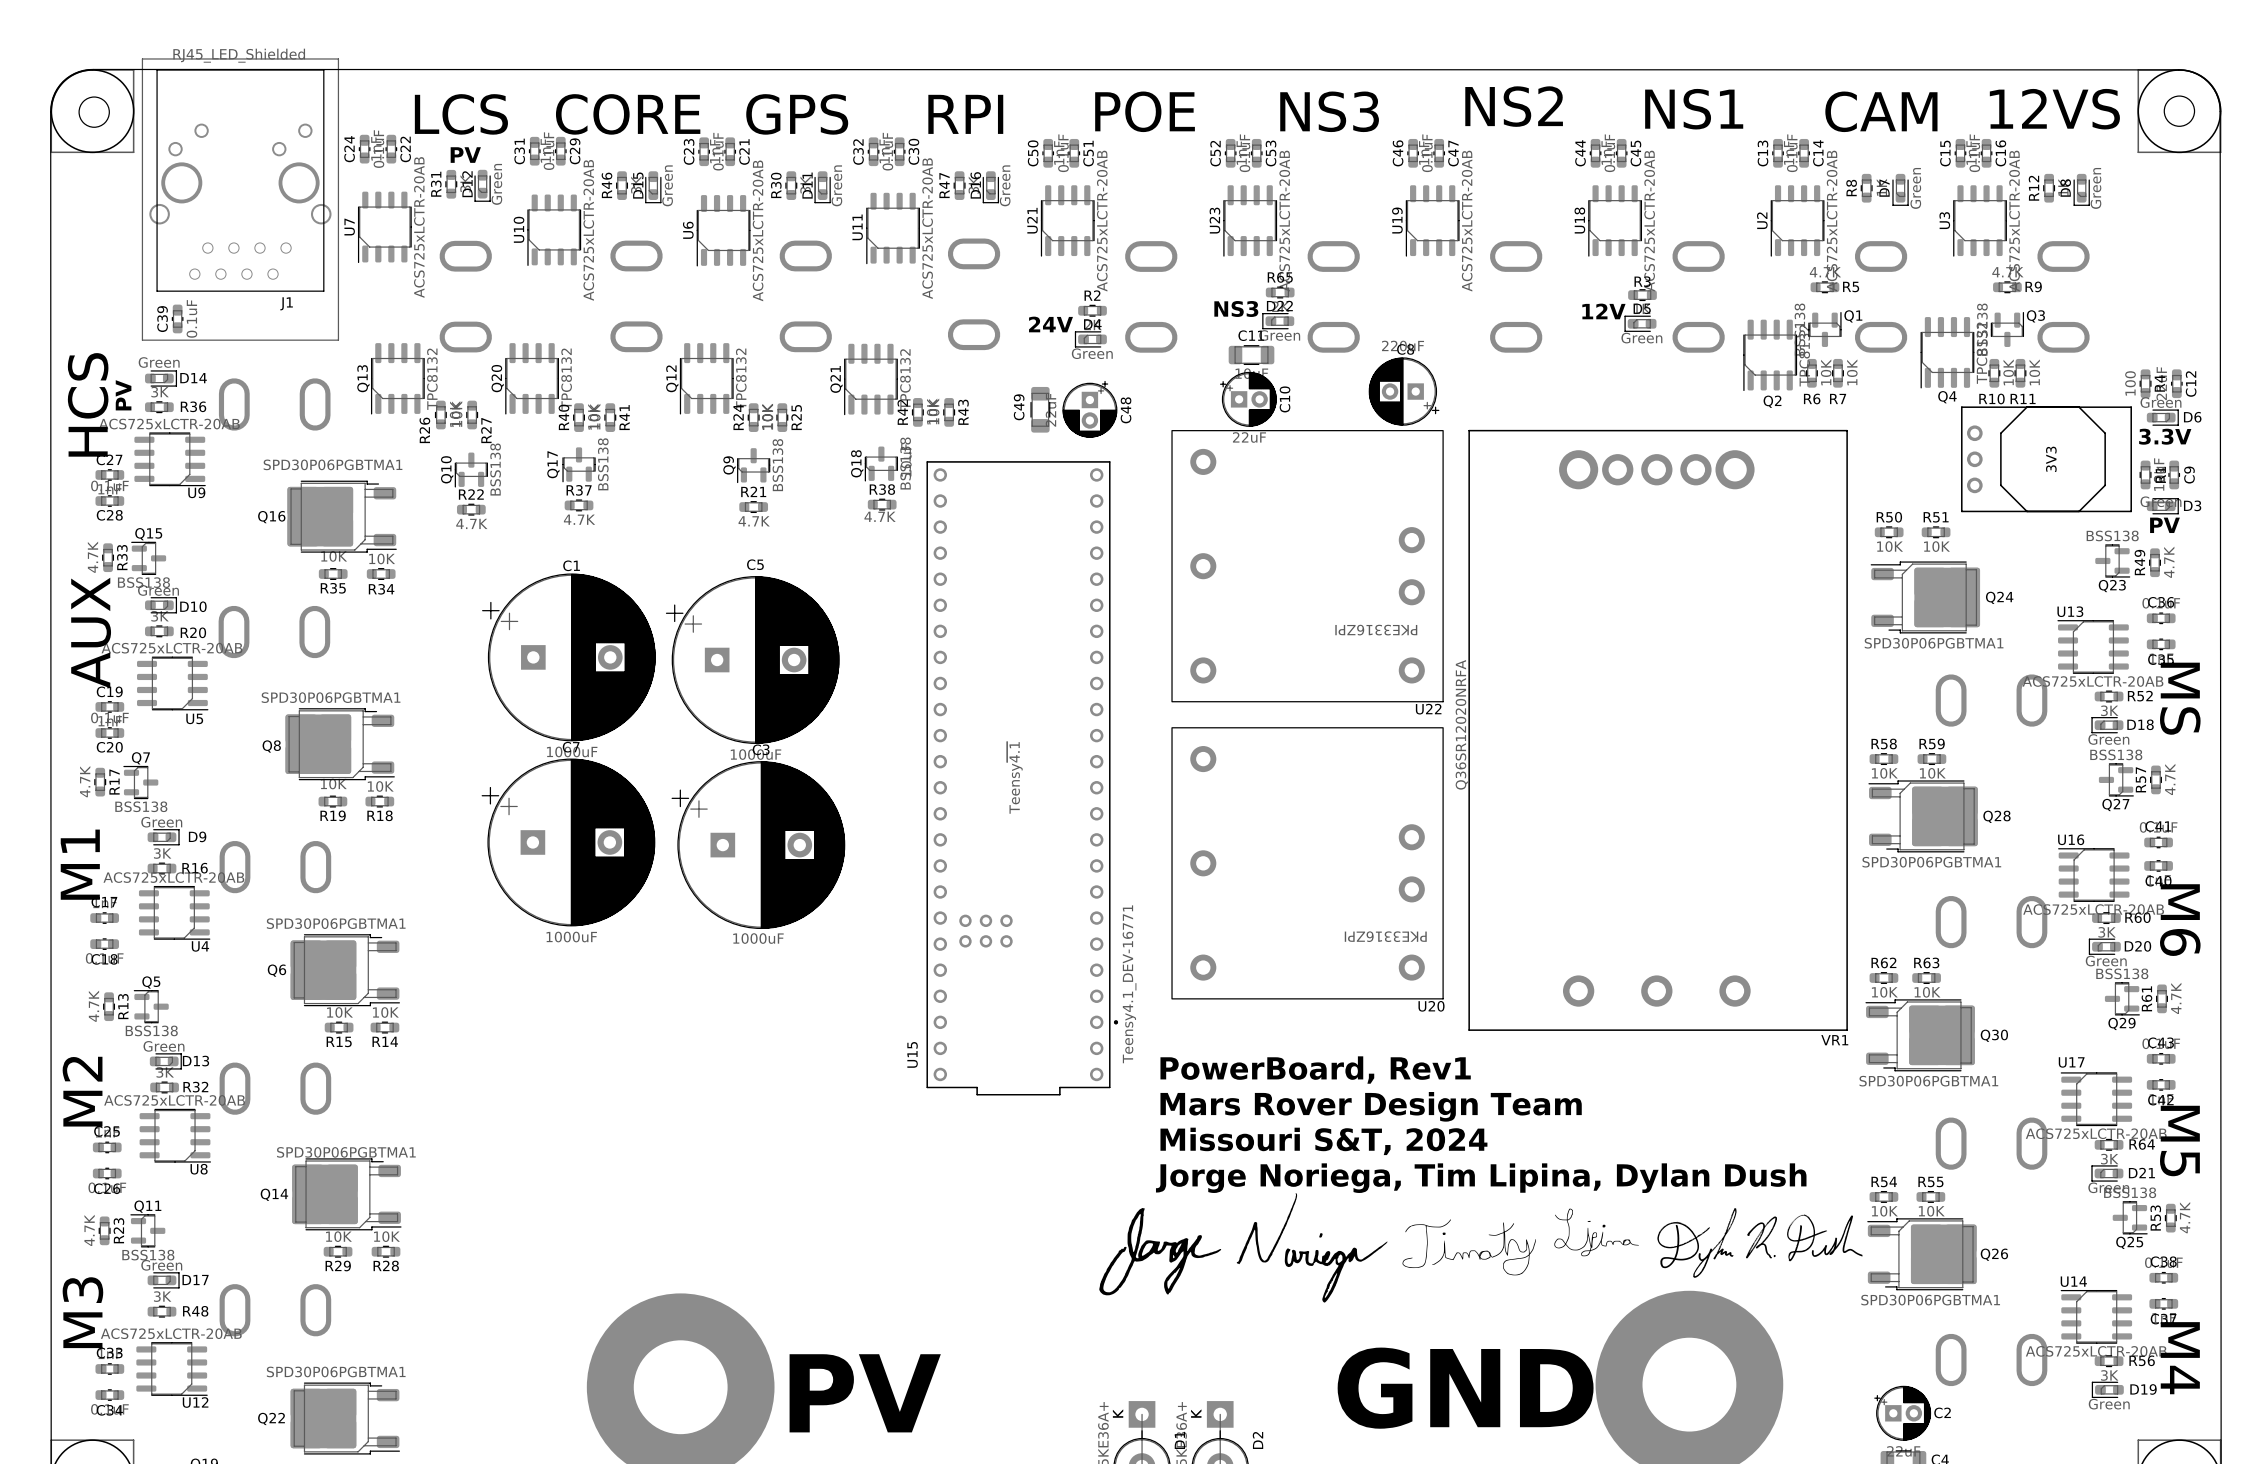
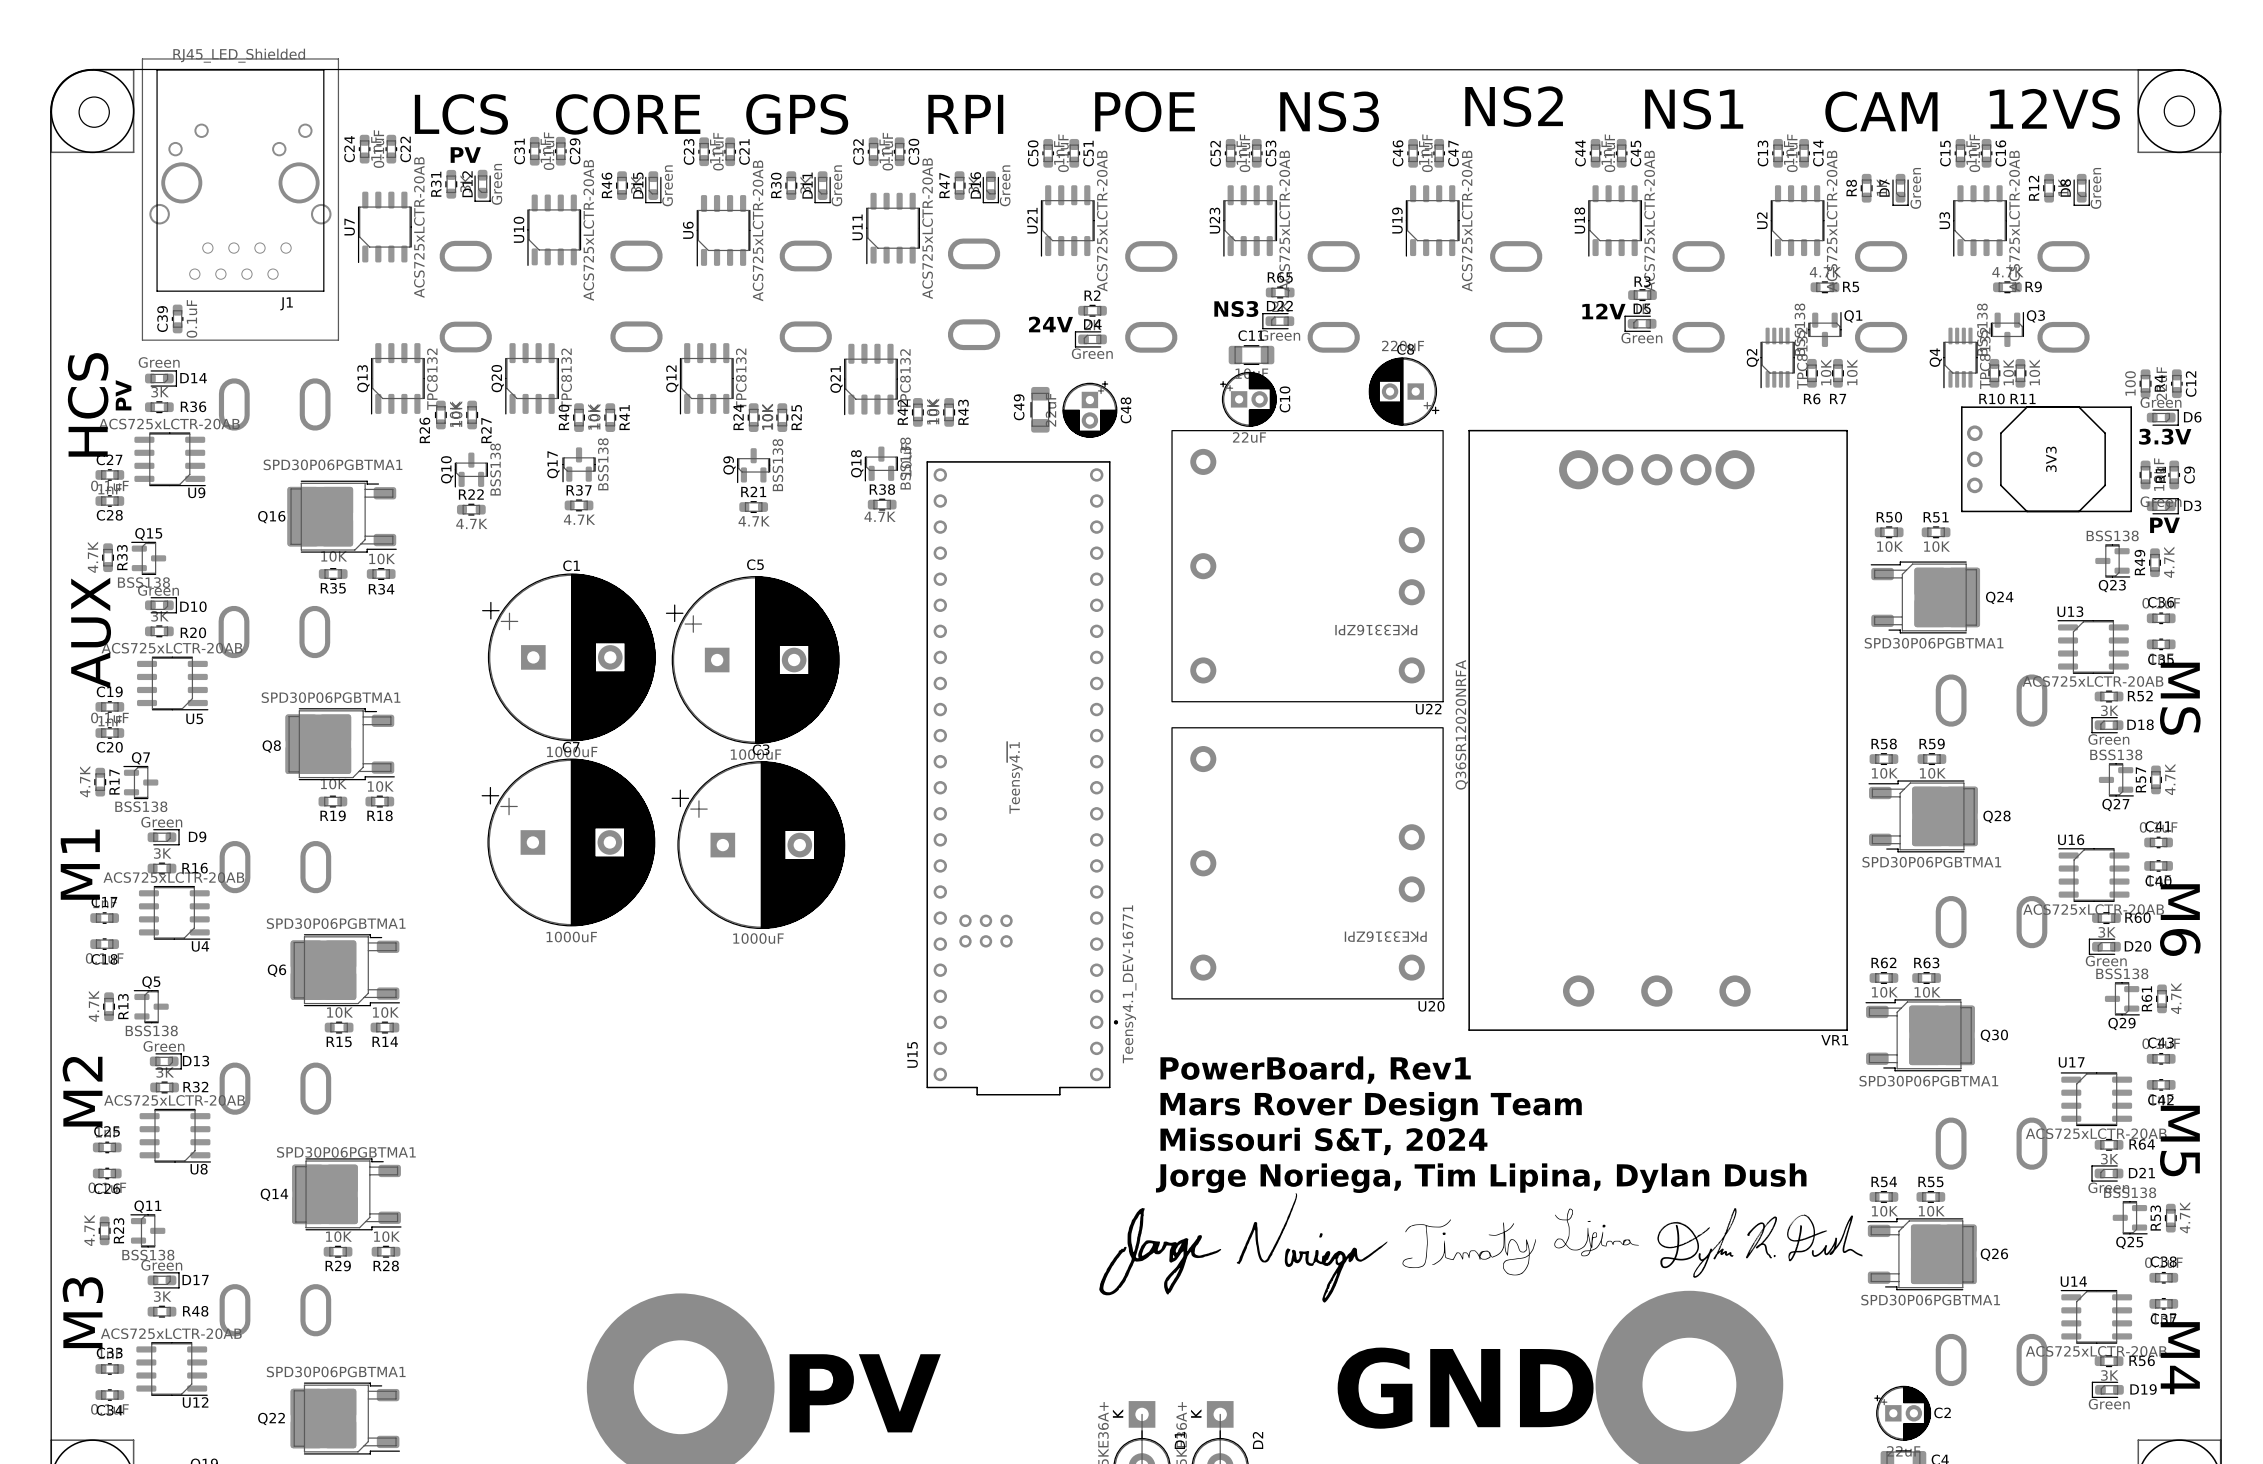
Q4 footprint: [1920, 317, 1975, 389] -> [1943, 327, 1978, 389]
Q2 footprint: [1743, 319, 1798, 392] -> [1760, 327, 1795, 389]
Q4 name position: Q4 (1947, 397) -> Q4 (1935, 357)
Q2 name position: Q2 (1772, 401) -> Q2 (1752, 357)

